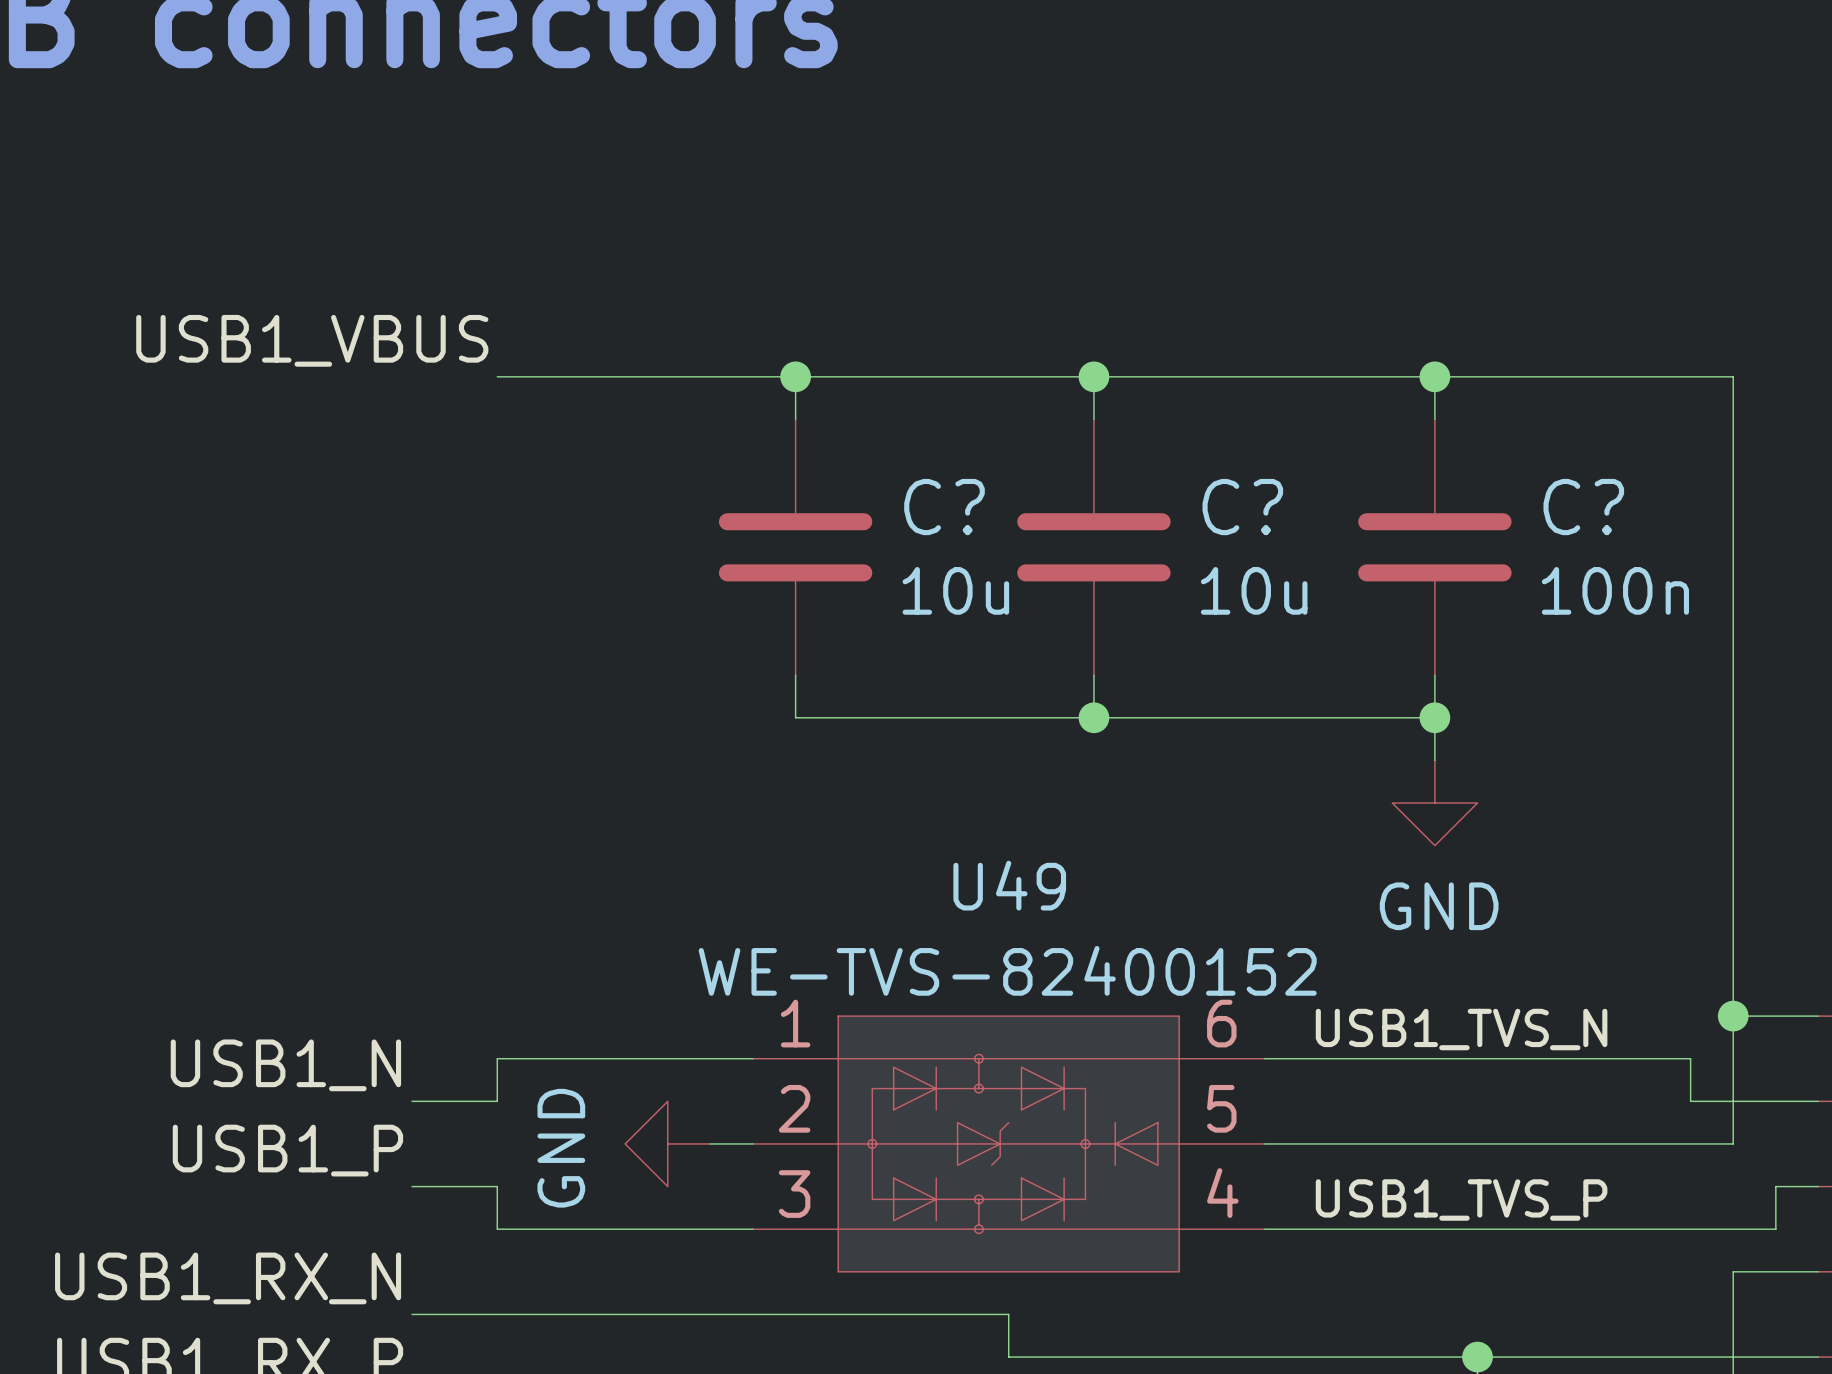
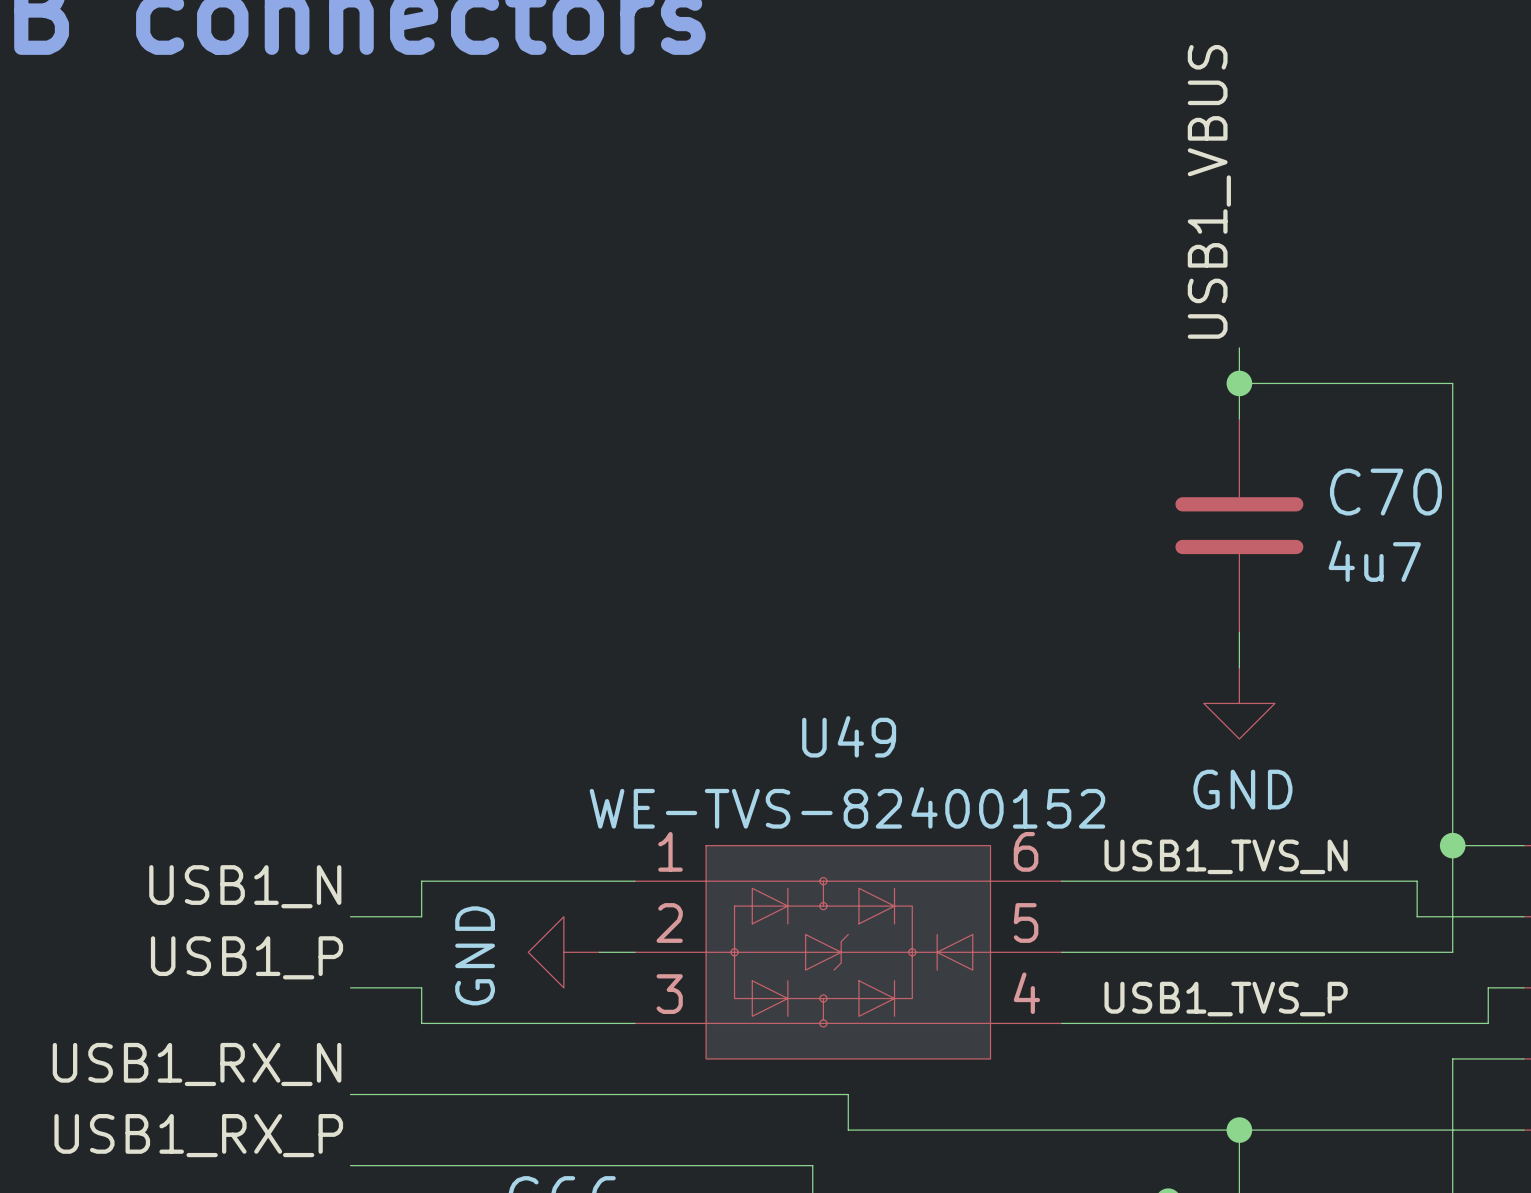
label: none -> USB1_VBUS (1209, 191)
label: USB1_VBUS (312, 340) -> none
wire: (497, 376) (1733, 376) (1733, 462) -> (1239, 383) (1452, 383)
wire: (795, 376) (795, 419) -> none
junction: (795, 376) -> none
wire: (1093, 376) (1093, 419) -> none
junction: (1093, 376) -> none
wire: (1434, 376) (1434, 419) -> (1239, 632) (1239, 667)
junction position: (1434, 376) -> (1239, 383)
C?: (795, 547) -> none
C?: (1093, 547) -> none
C?: (1434, 547) -> none
C70: none -> (1239, 525)
wire: (795, 675) (795, 717) (1434, 717) -> none
wire: (1093, 675) (1093, 717) -> none
wire: (1434, 675) (1434, 760) -> (1239, 347) (1239, 419)
junction: (1093, 717) -> none
junction: (1434, 717) -> none
power symbol position: GND (1434, 803) -> GND (1239, 703)

